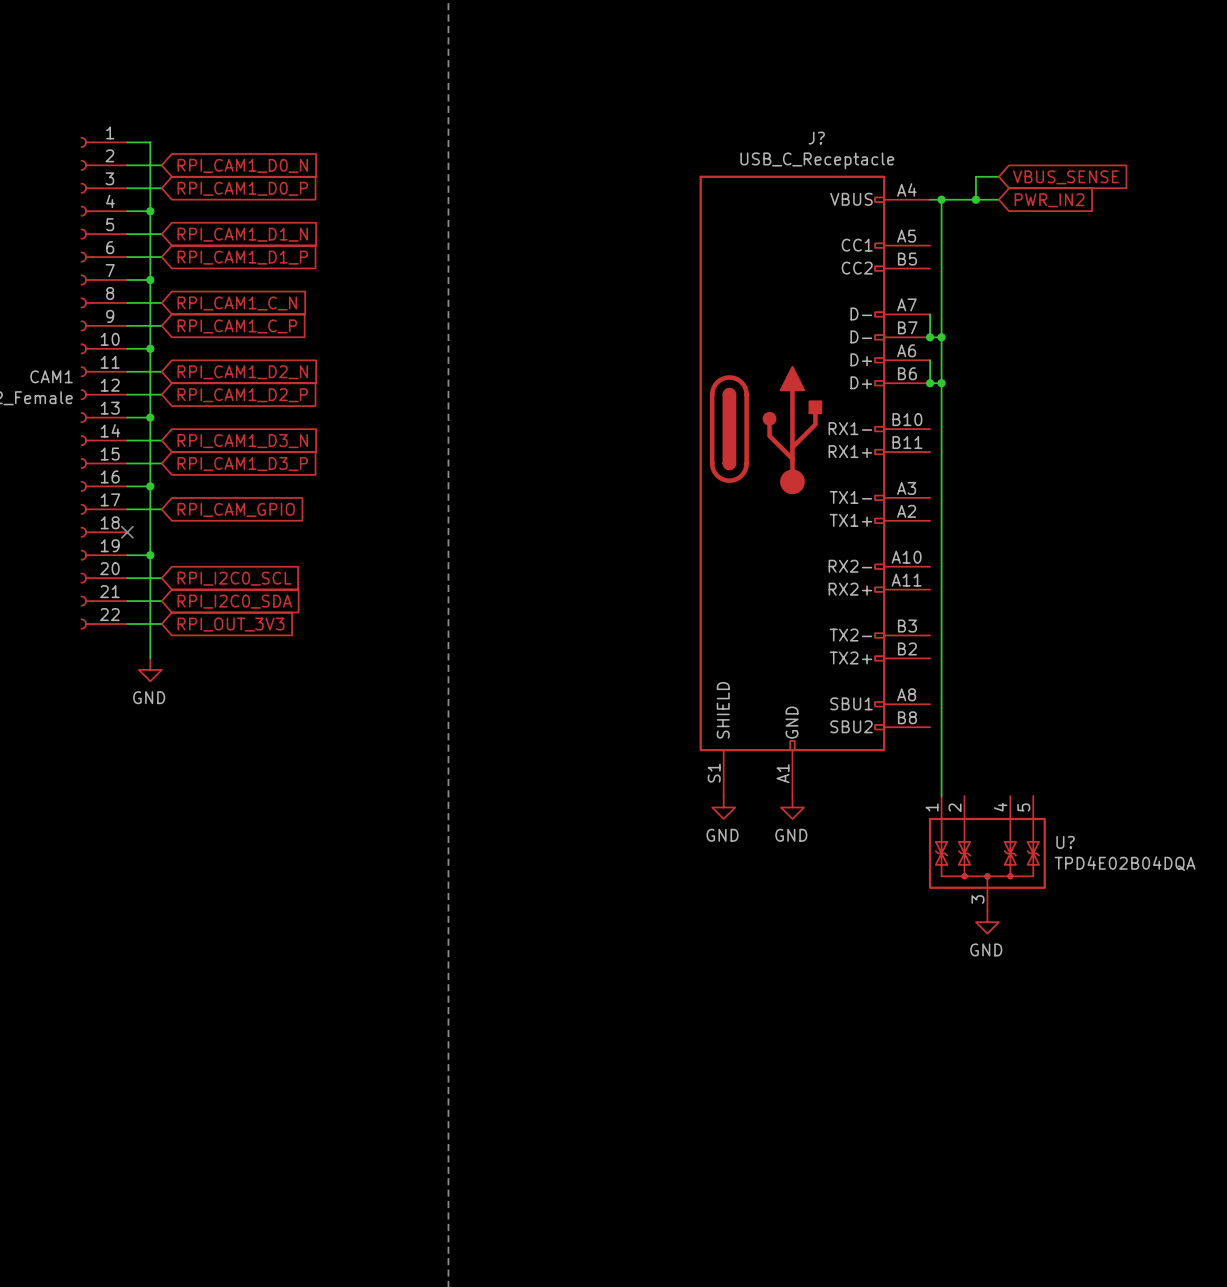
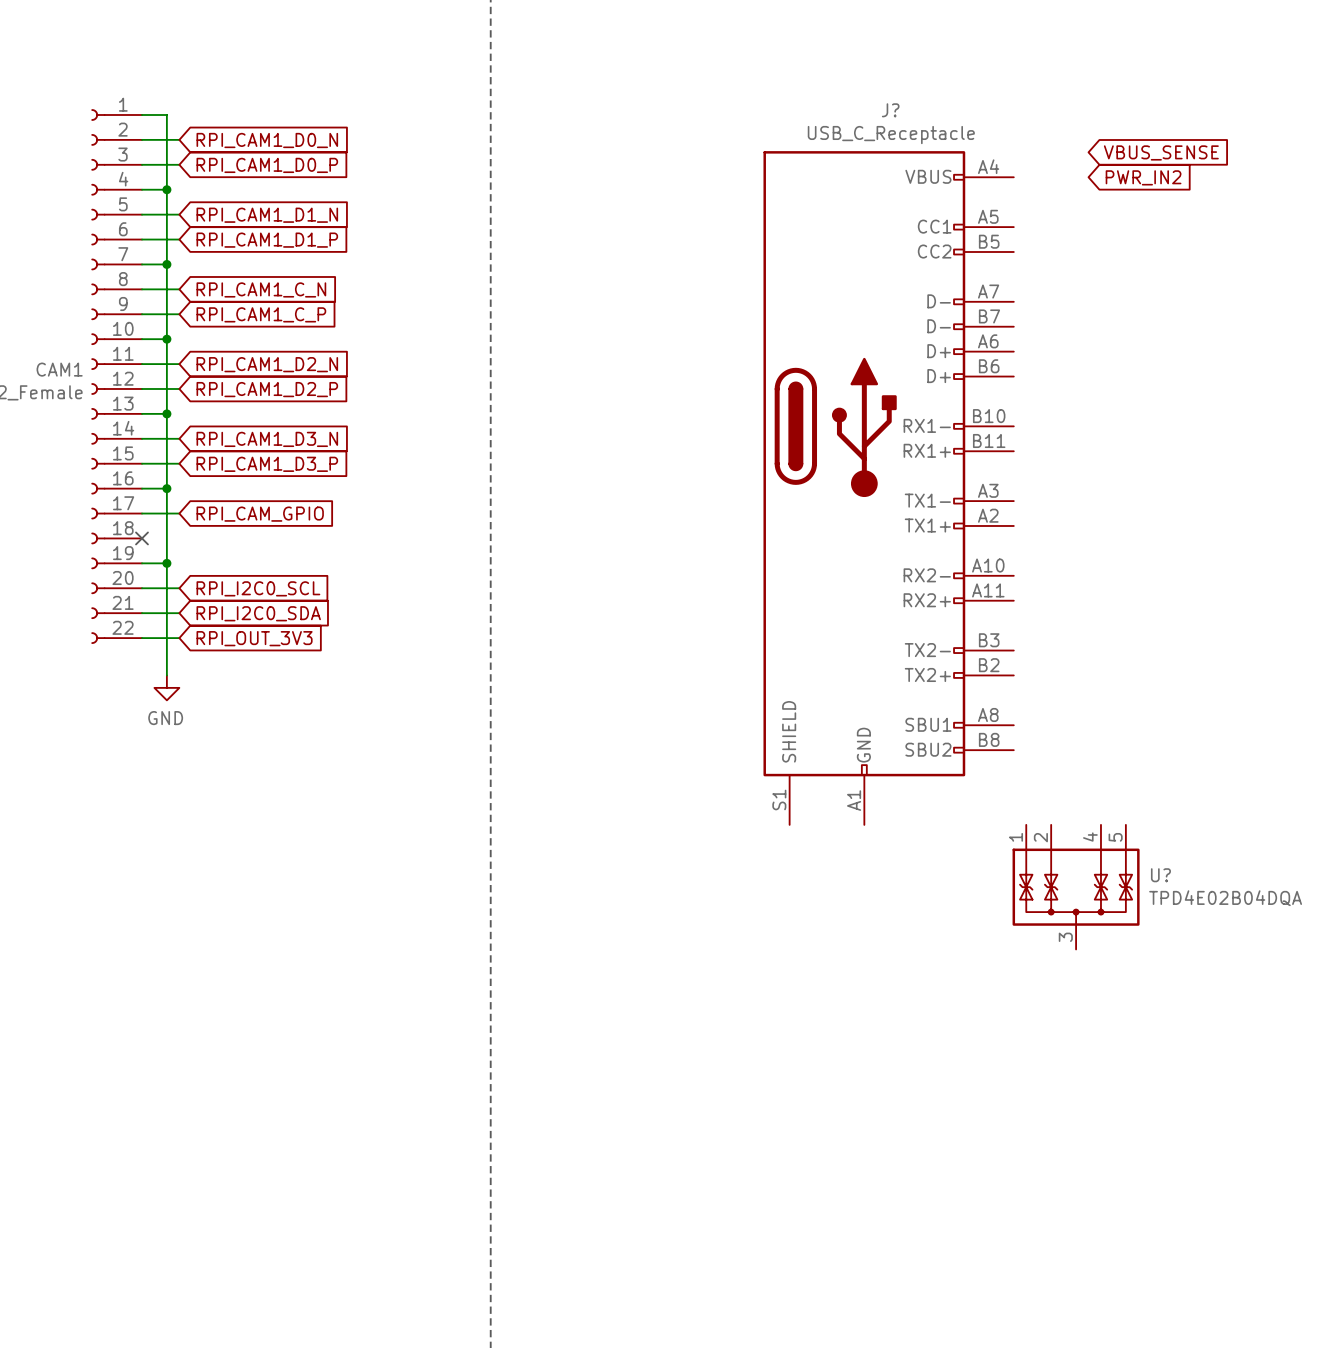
wire: (998, 176) (975, 176) (975, 199) -> none
wire: (930, 199) (998, 199) -> none
wire: (941, 199) (941, 796) -> none
junction: (941, 199) -> none
junction: (975, 199) -> none
wire: (930, 314) (930, 337) (941, 337) -> none
junction: (930, 337) -> none
junction: (941, 337) -> none
wire: (930, 360) (930, 383) (941, 383) -> none
junction: (930, 383) -> none
junction: (941, 383) -> none
power symbol: GND (723, 807) -> none
power symbol: GND (792, 807) -> none
power symbol: GND (987, 922) -> none

